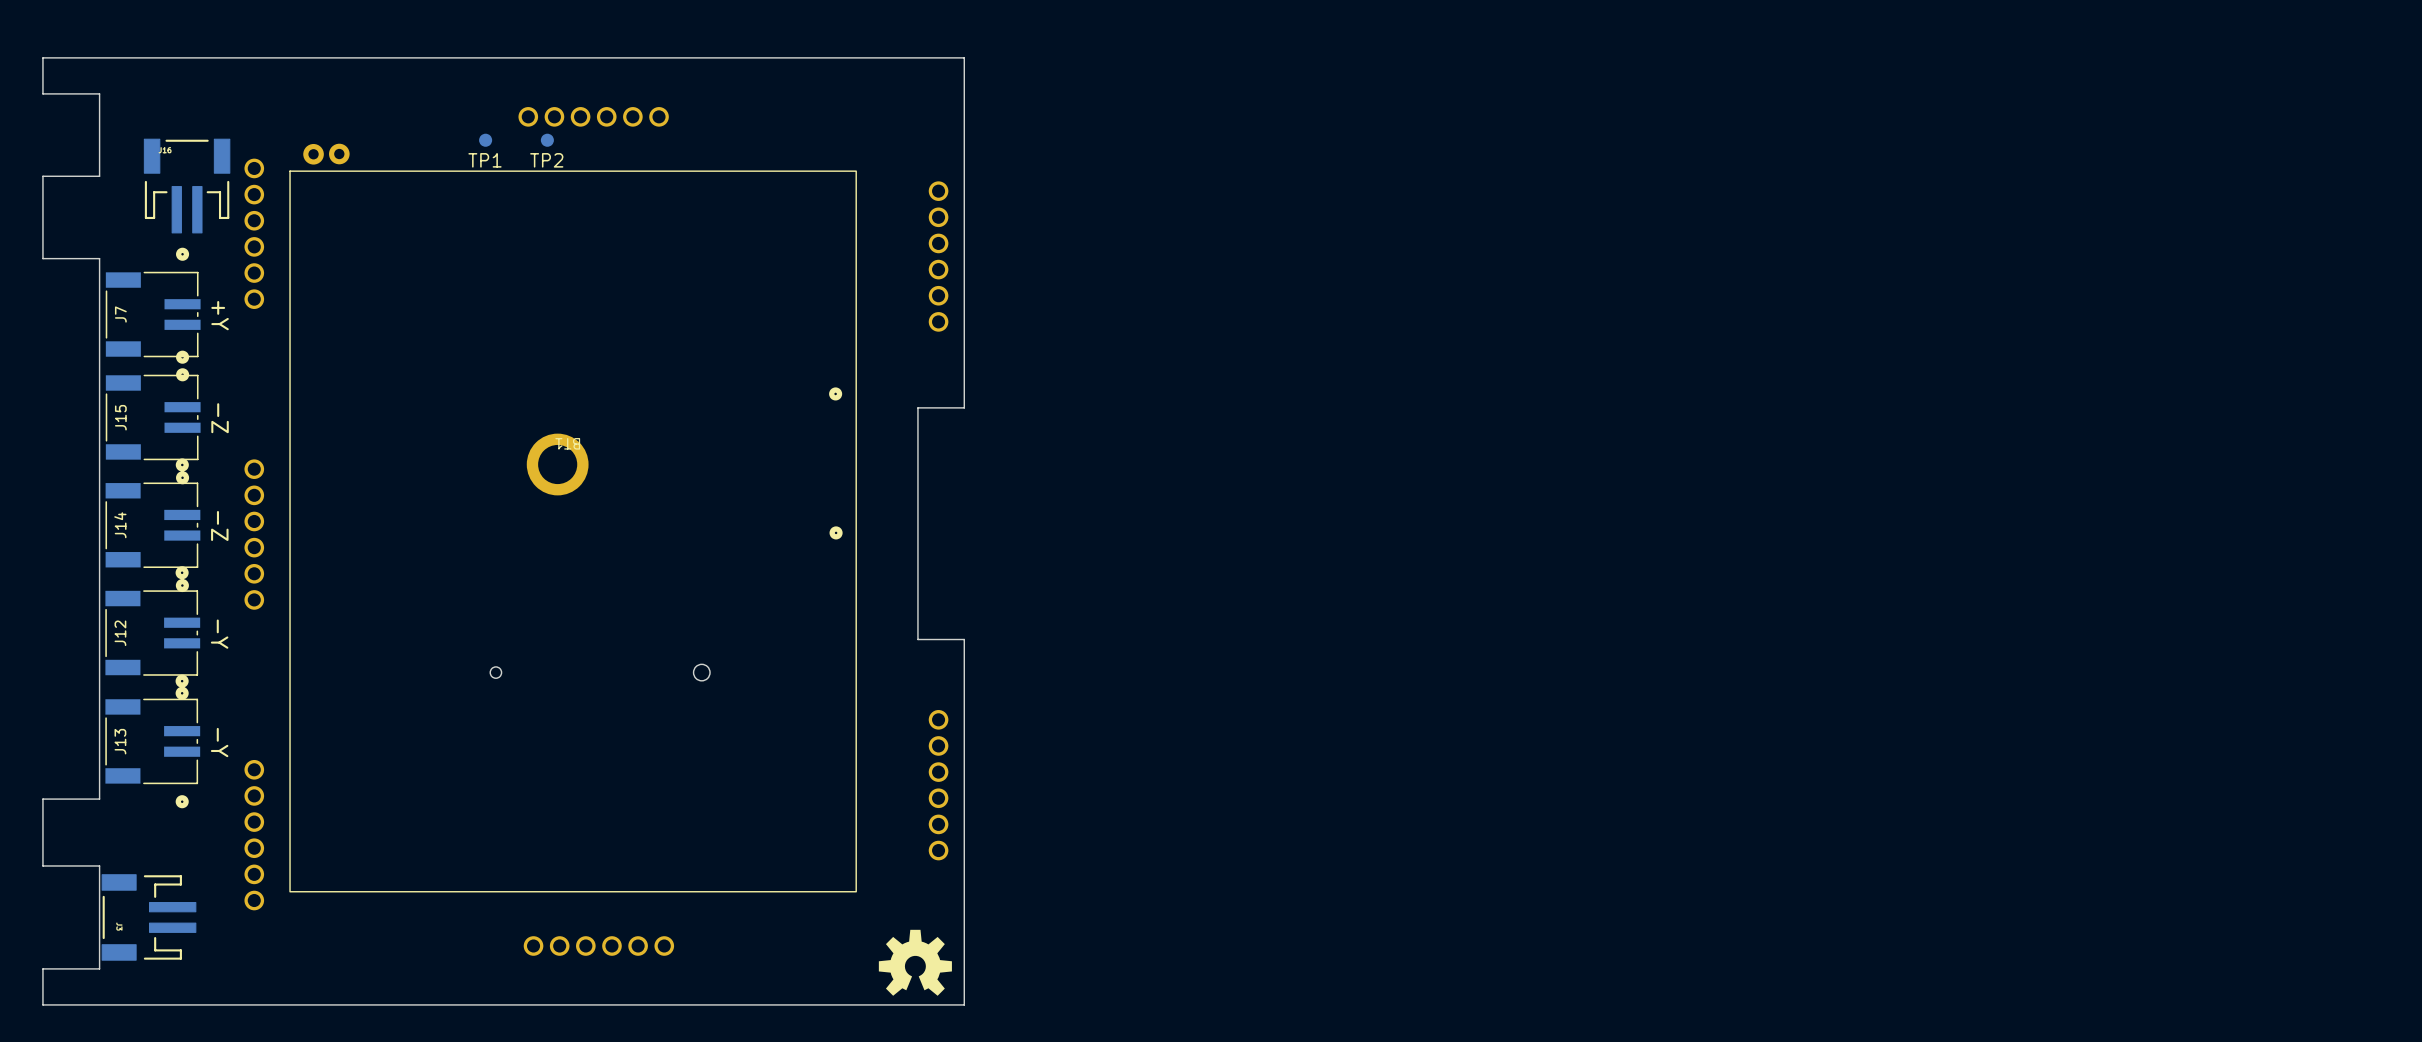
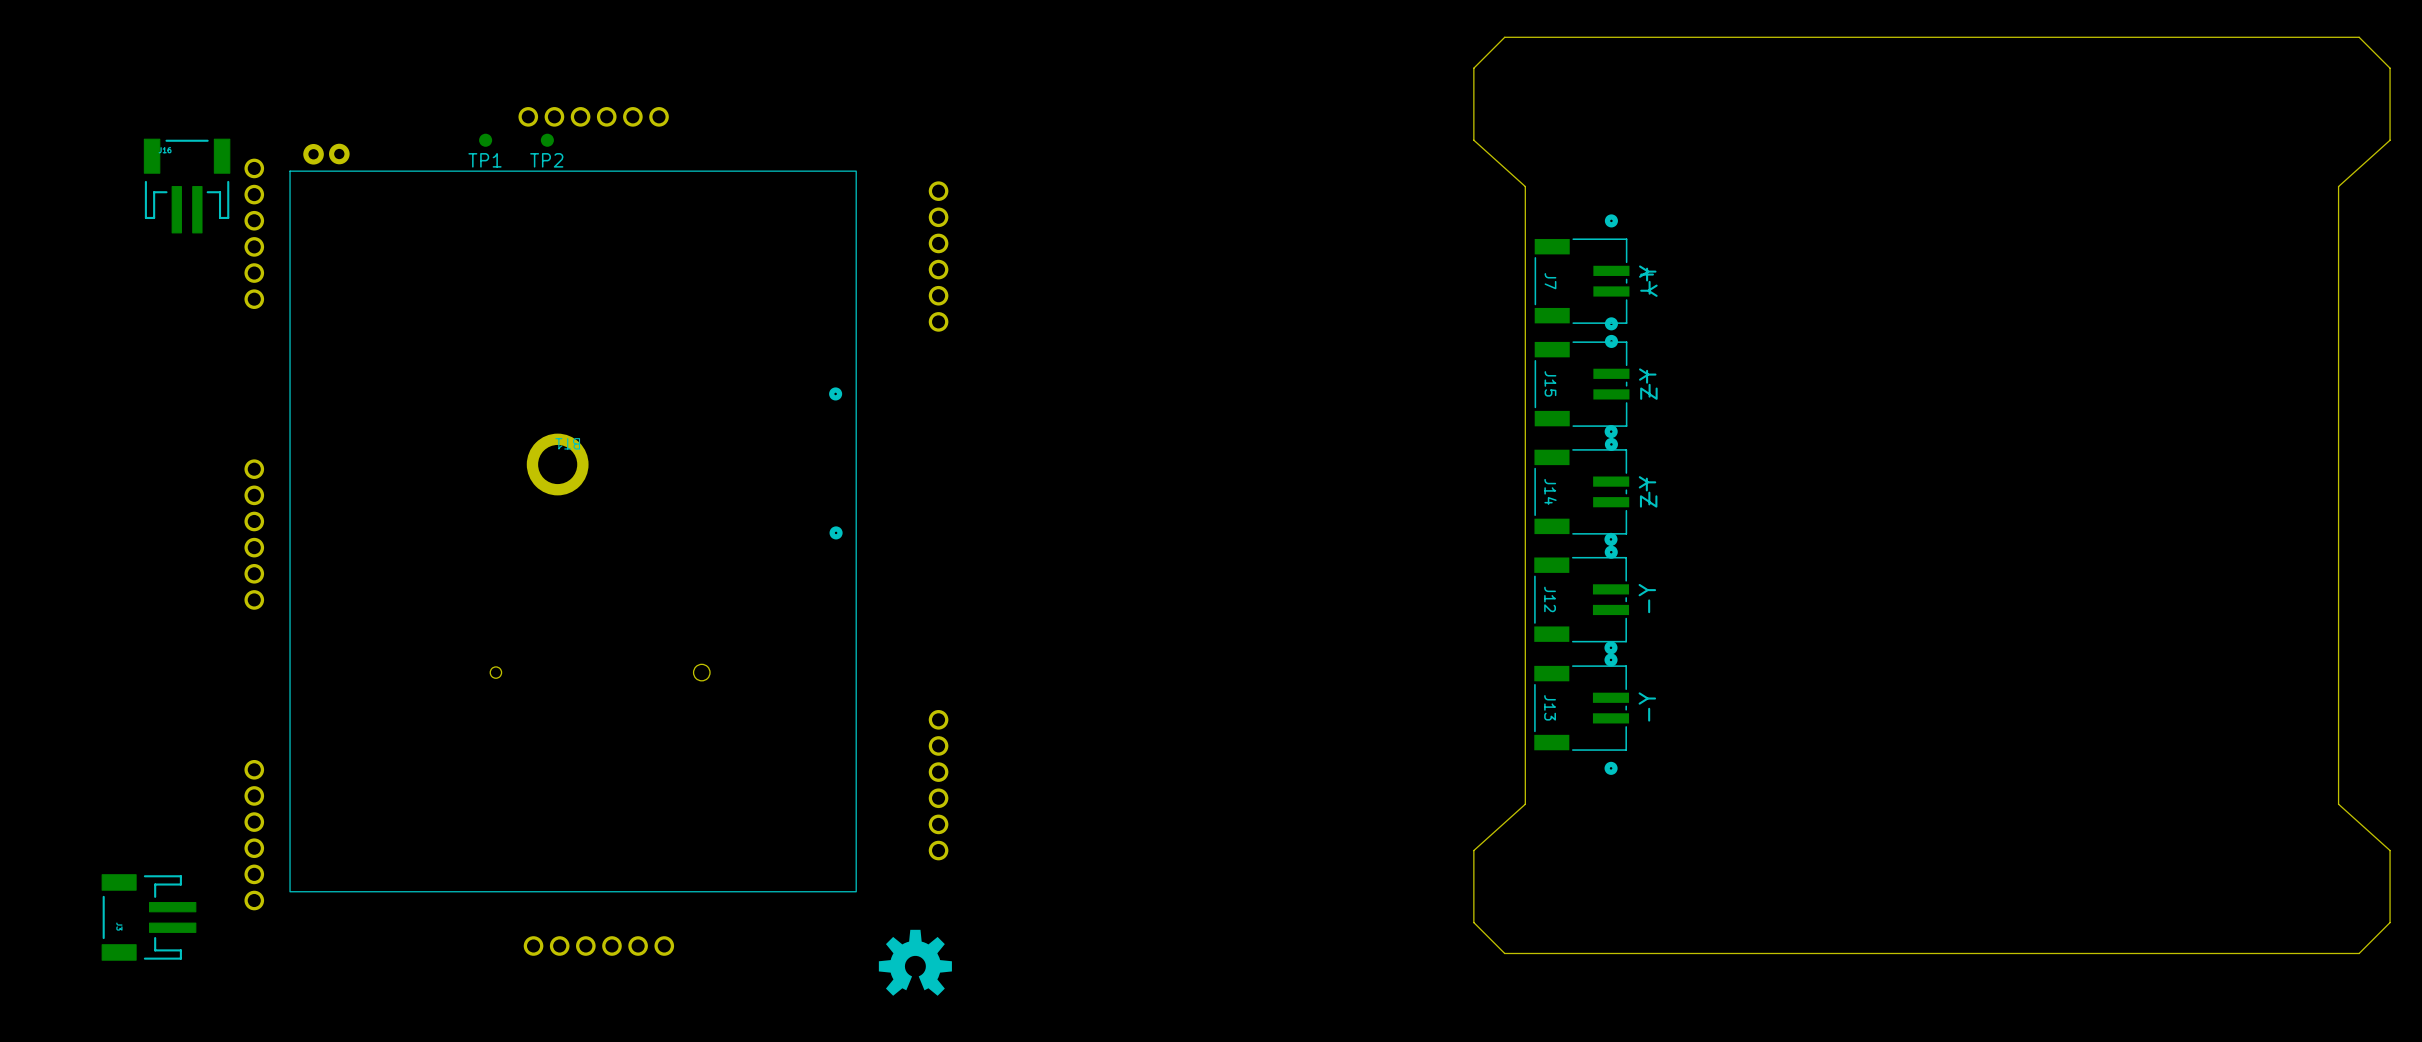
board edge: none -> (2359, 37) (1504, 37) (1473, 68) (1473, 140) (1525, 186) (1525, 804) (1473, 850) (1473, 922) (1504, 953) (2359, 953) (2390, 922) (2390, 850) (2338, 804) (2338, 186) (2390, 140) (2390, 68) (2359, 37)
board edge: (964, 57) (42, 57) (42, 93) (99, 93) (99, 176) (42, 176) (42, 258) (99, 258) (99, 799) (42, 799) (42, 865) (99, 865) (99, 968) (42, 968) (42, 1004) (964, 1004) (964, 639) (917, 639) (917, 407) (964, 407) (964, 57) -> none
J7 footprint: [105, 247, 201, 358] -> [1534, 214, 1630, 324]
part: none -> (1611, 341)
J15 footprint: [105, 350, 201, 461] -> [1534, 317, 1630, 427]
part: (182, 374) -> none
part: none -> (1611, 444)
J14 footprint: [105, 458, 201, 569] -> [1534, 425, 1630, 535]
part: (182, 477) -> none
part: none -> (1611, 552)
part: (182, 585) -> none
J12 position: (152, 621) -> (1581, 587)
J12 name rotation: 0° (120, 633) -> 180° (1550, 599)
part: none -> (1611, 659)
part: (182, 693) -> none
J13 position: (152, 729) -> (1581, 696)
J13 name rotation: 0° (120, 741) -> 180° (1550, 707)
part: none -> (1611, 768)
part: (182, 801) -> none

